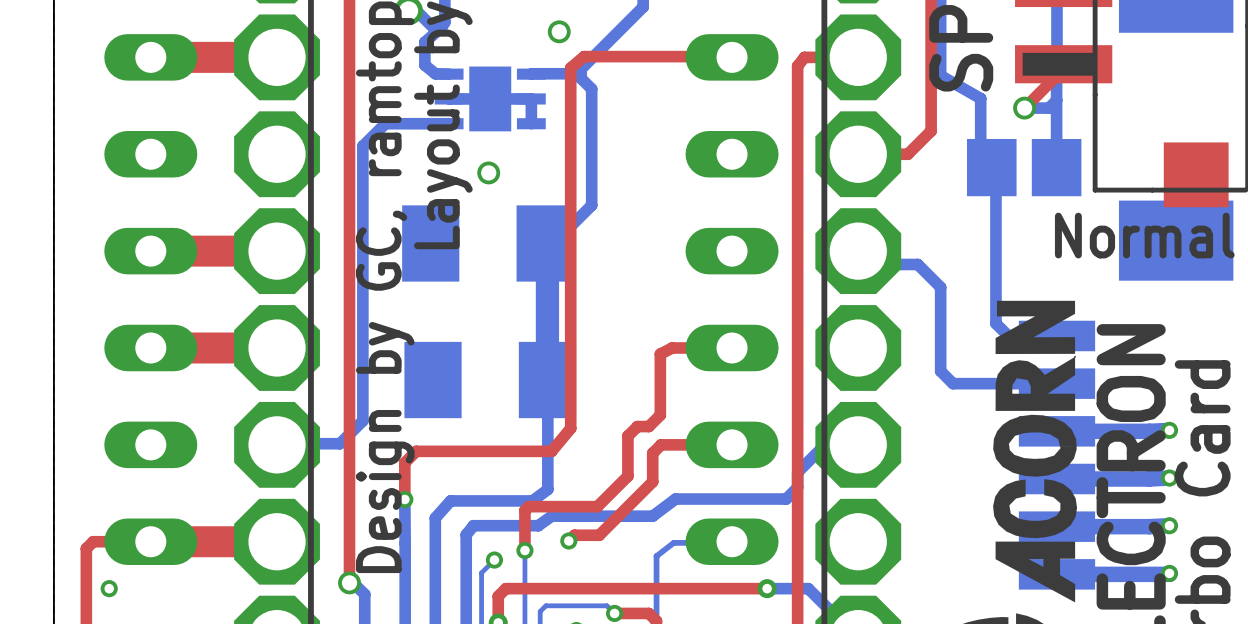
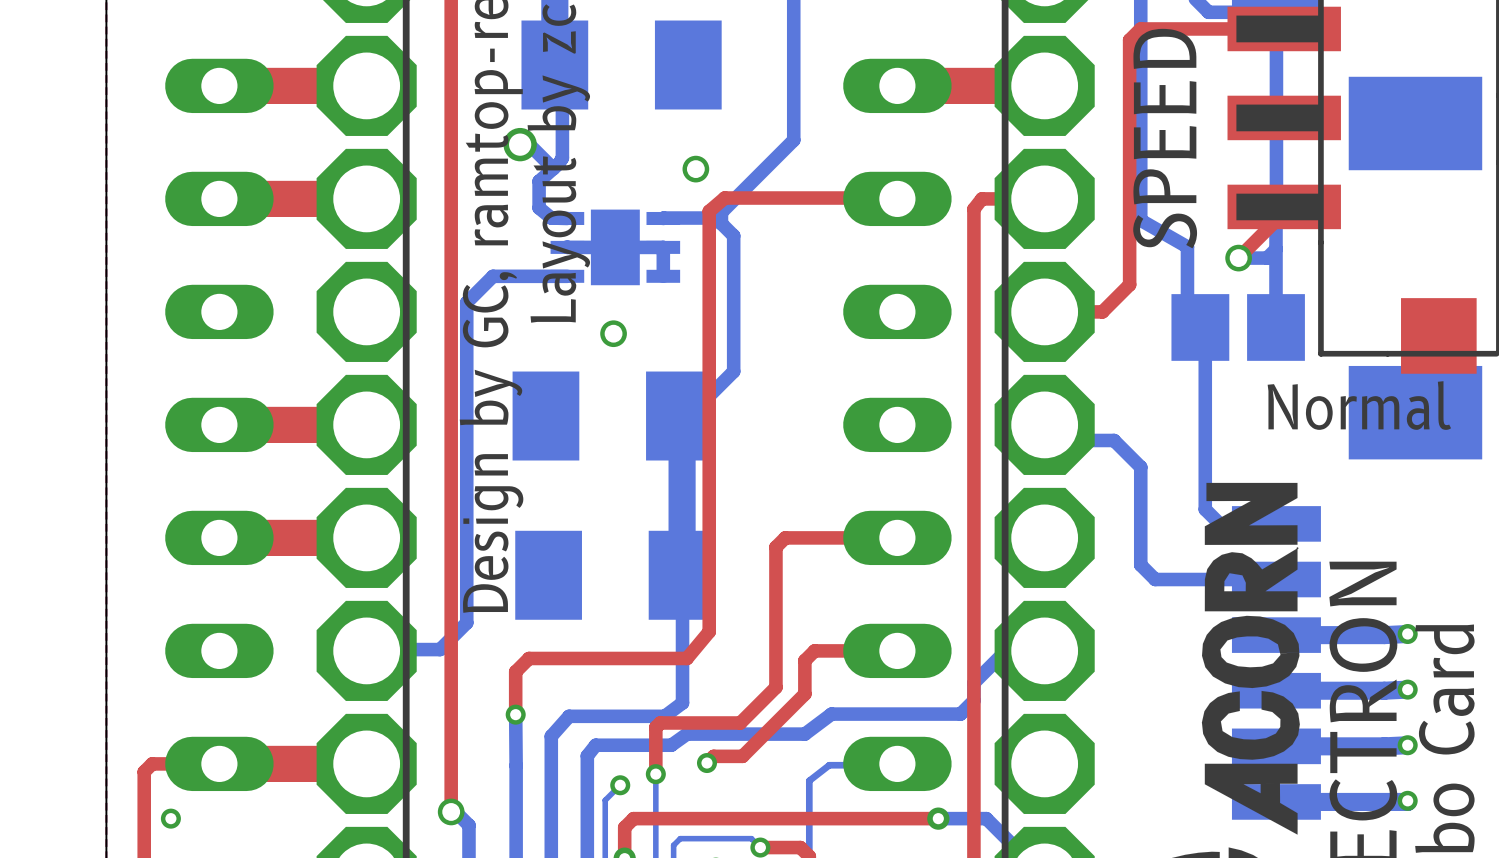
top track: (672, 347) (660, 354) (660, 415) (648, 426) (637, 426) (627, 436) -> (827, 537) (785, 537) (775, 547) (775, 640)

